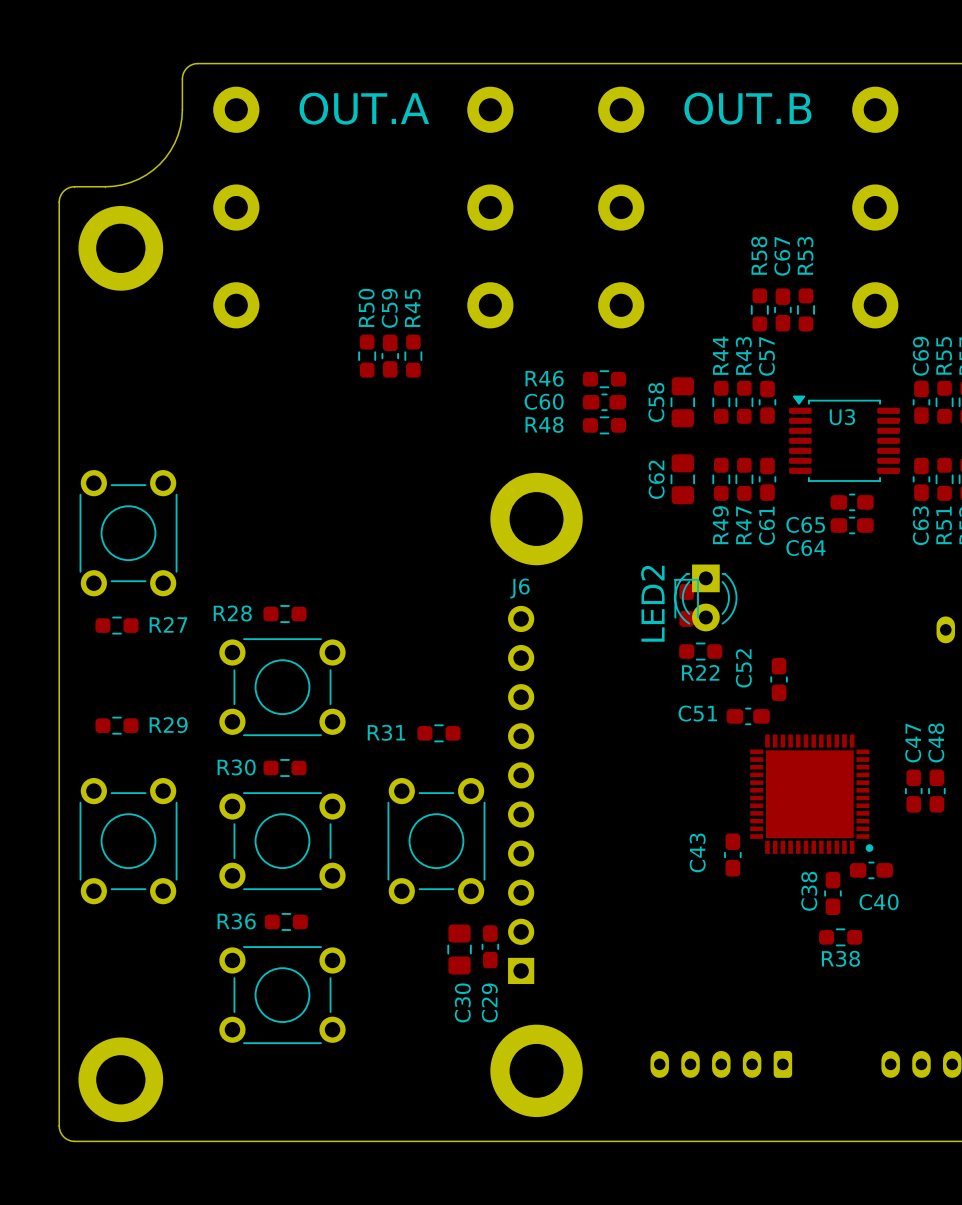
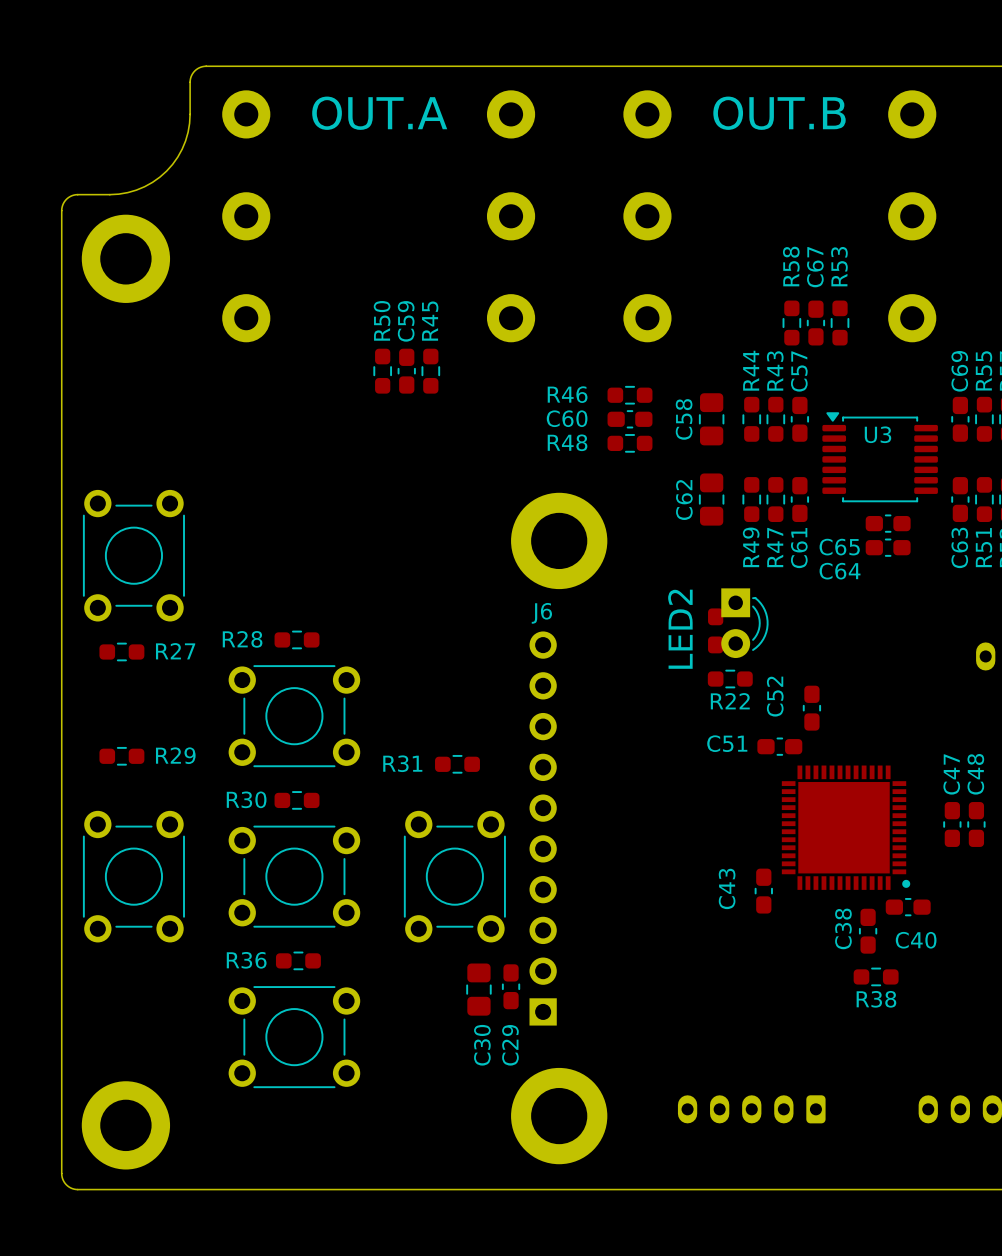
part footprint: [674, 564, 738, 632] -> [721, 588, 769, 659]
part footprint: [674, 578, 699, 627] -> [708, 608, 724, 654]

